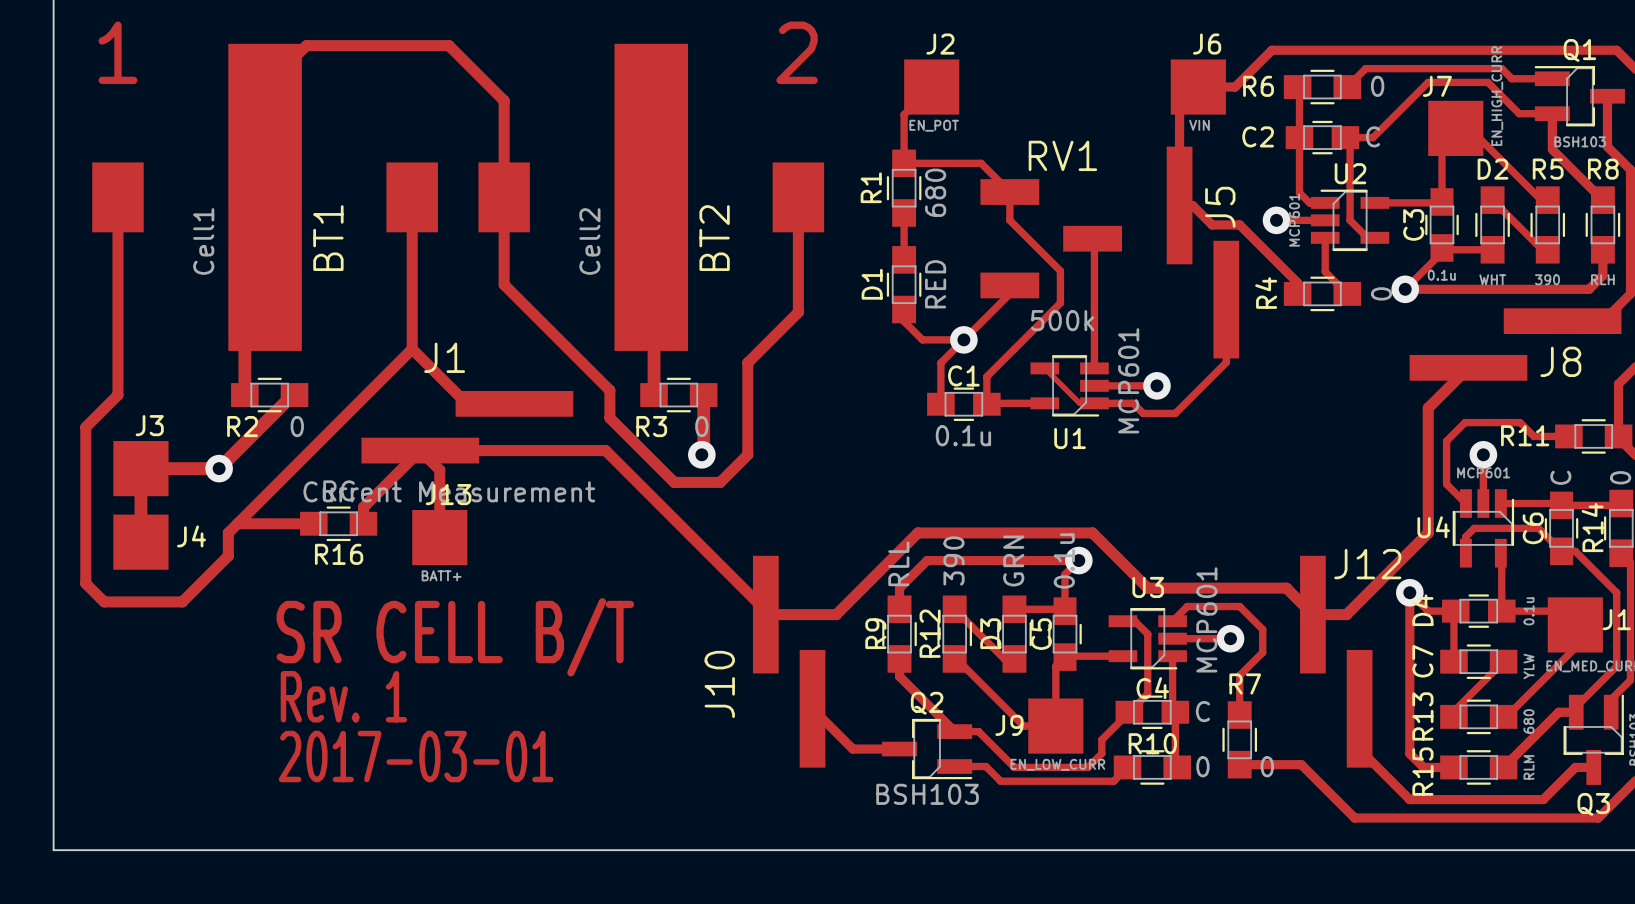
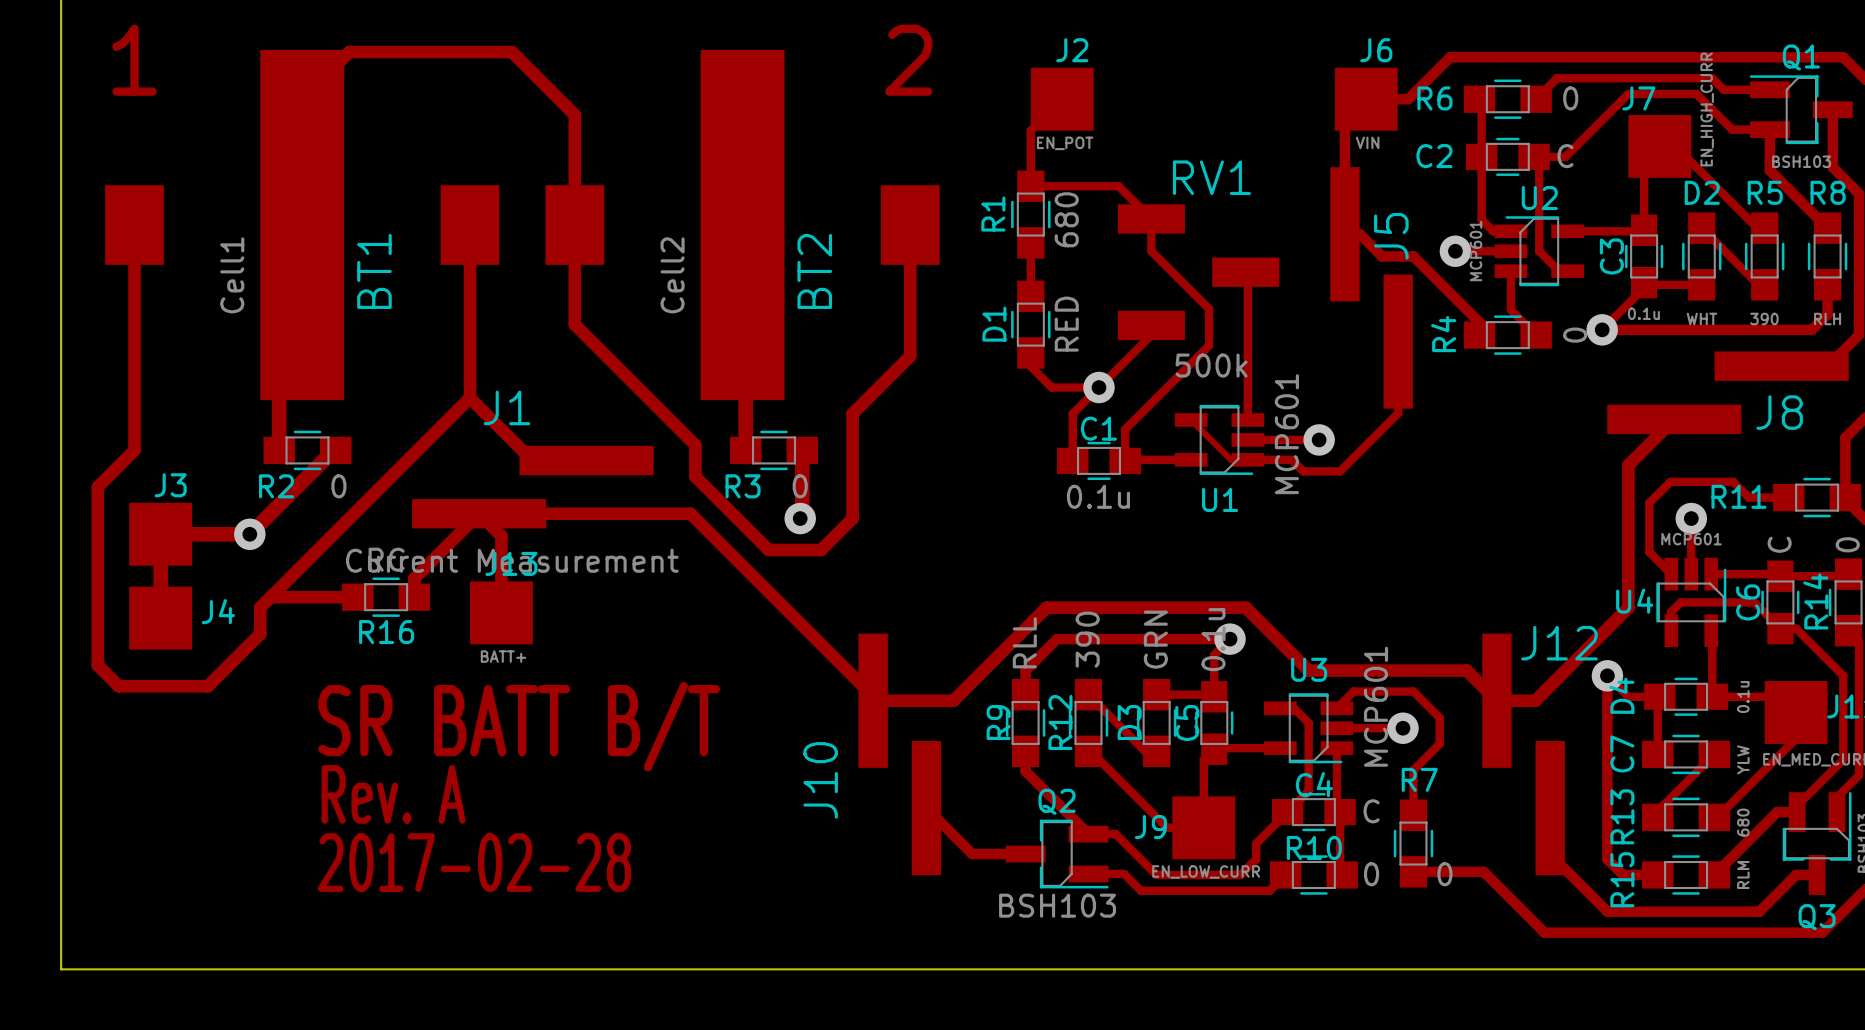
text: SR CELL B/T (455, 637) -> SR BATT B/T (519, 726)
text: Rev. 1 (343, 696) -> Rev. A (393, 794)
text: 2017-03-01 (416, 756) -> 2017-02-28 (474, 862)

